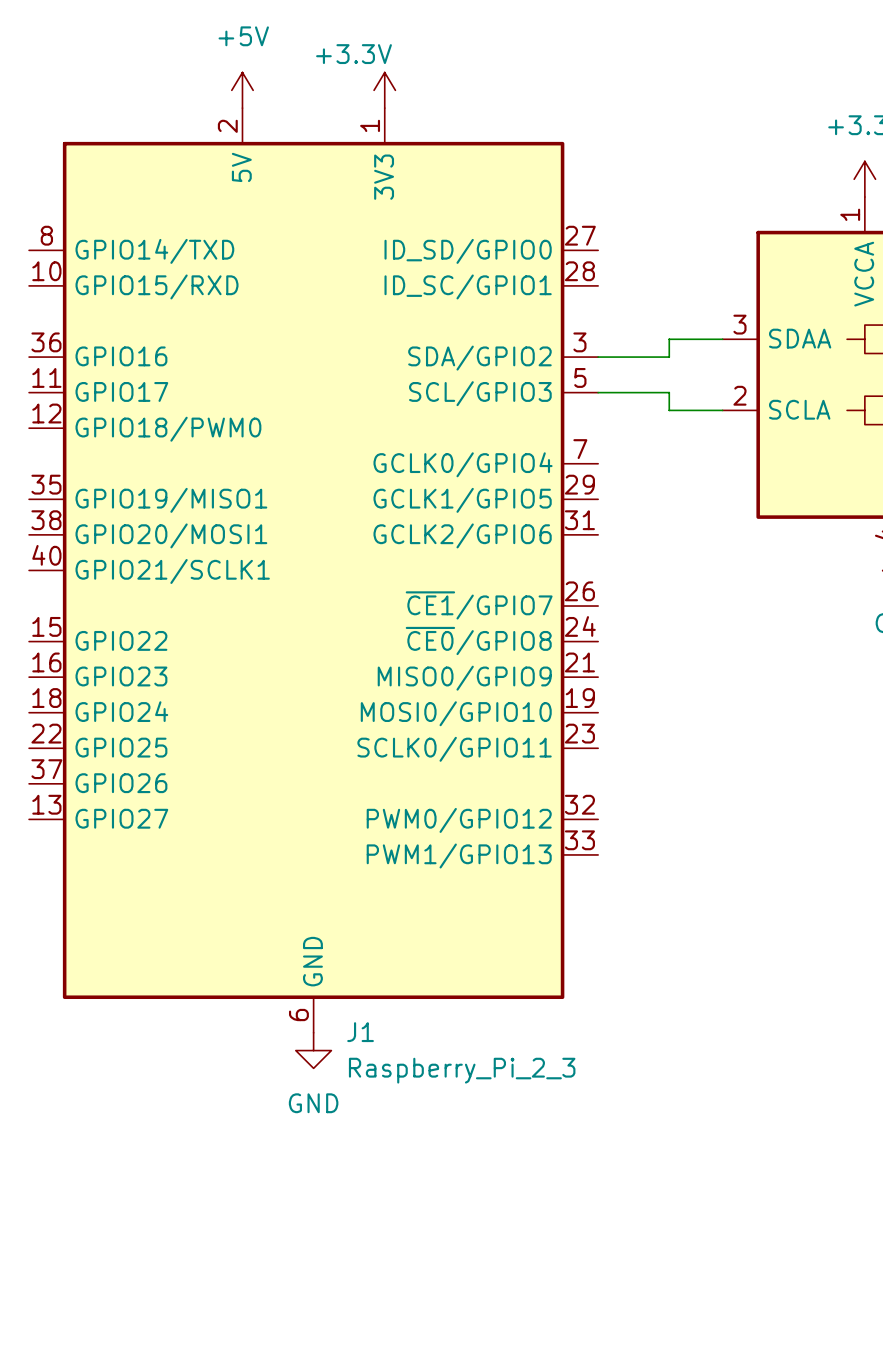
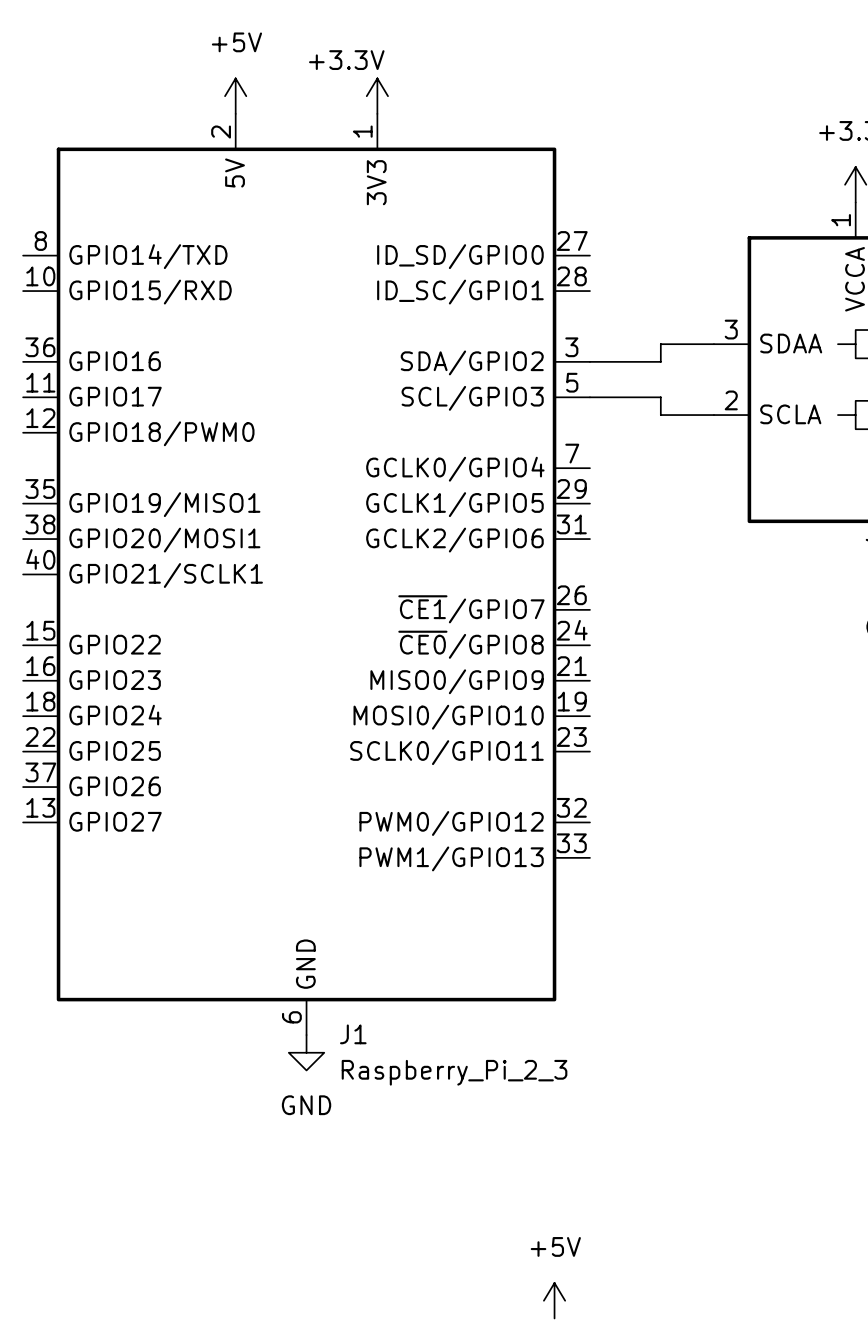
power symbol: none -> +5V (554, 1300)

